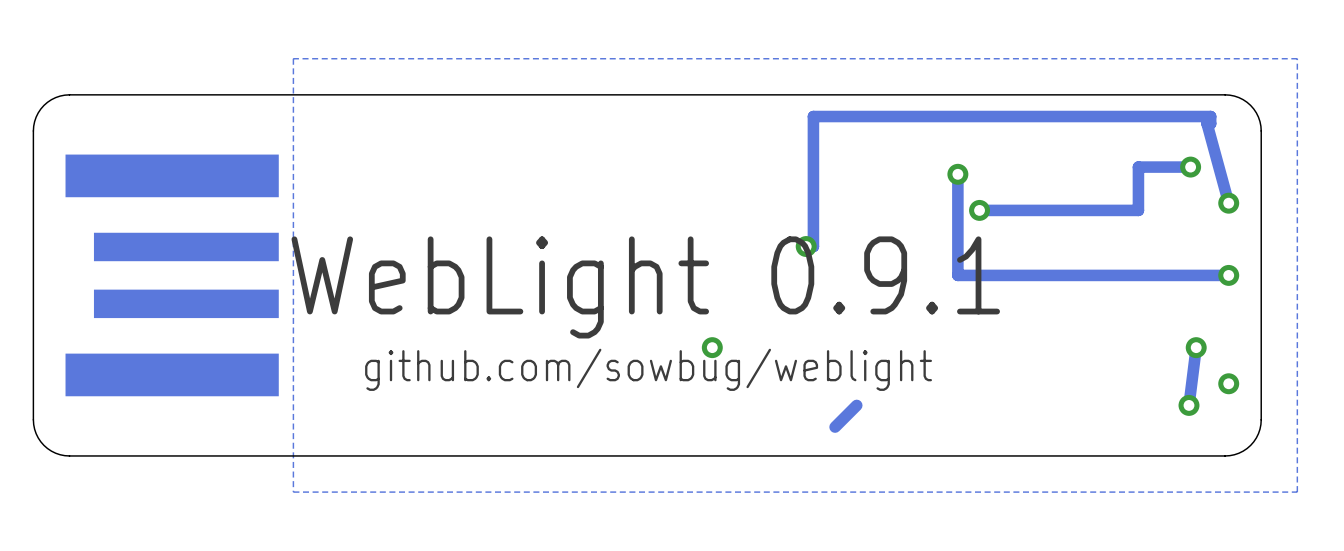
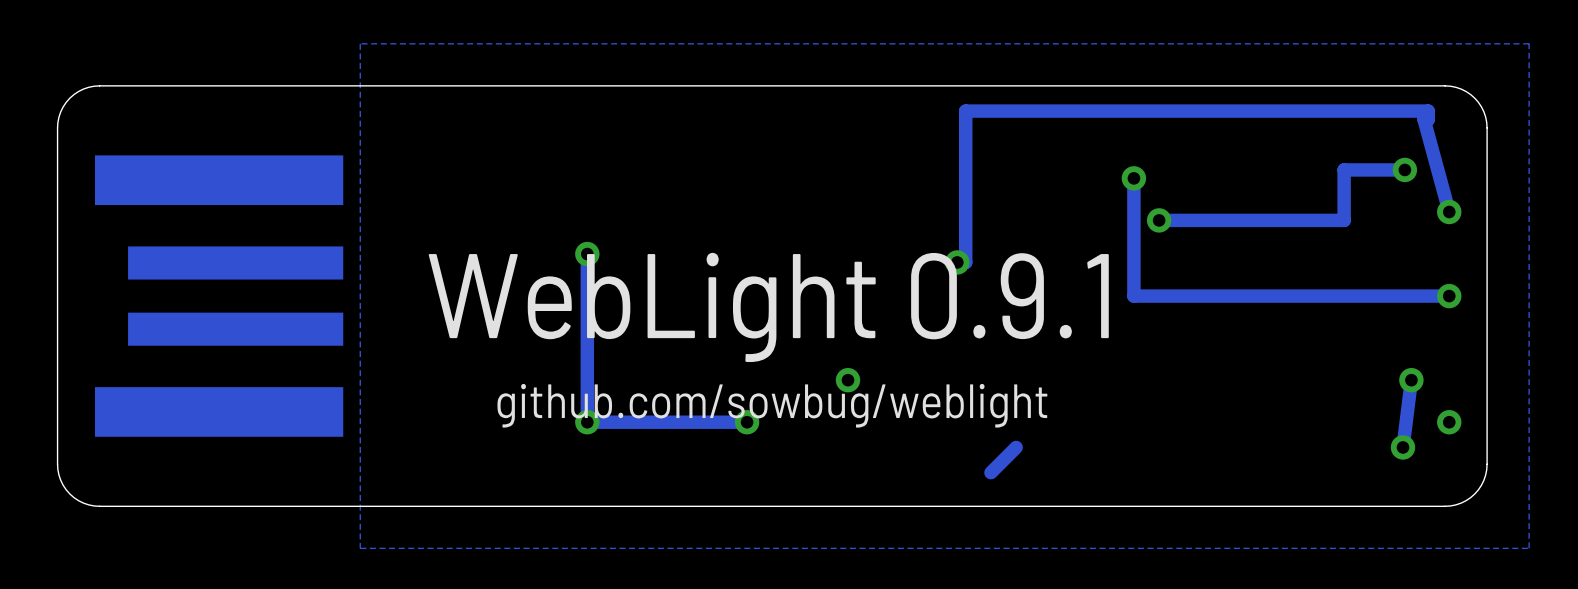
track: none -> (587, 254) (587, 422) (747, 422)
via: none -> (587, 254)
via: none -> (587, 422)
via: none -> (747, 422)

